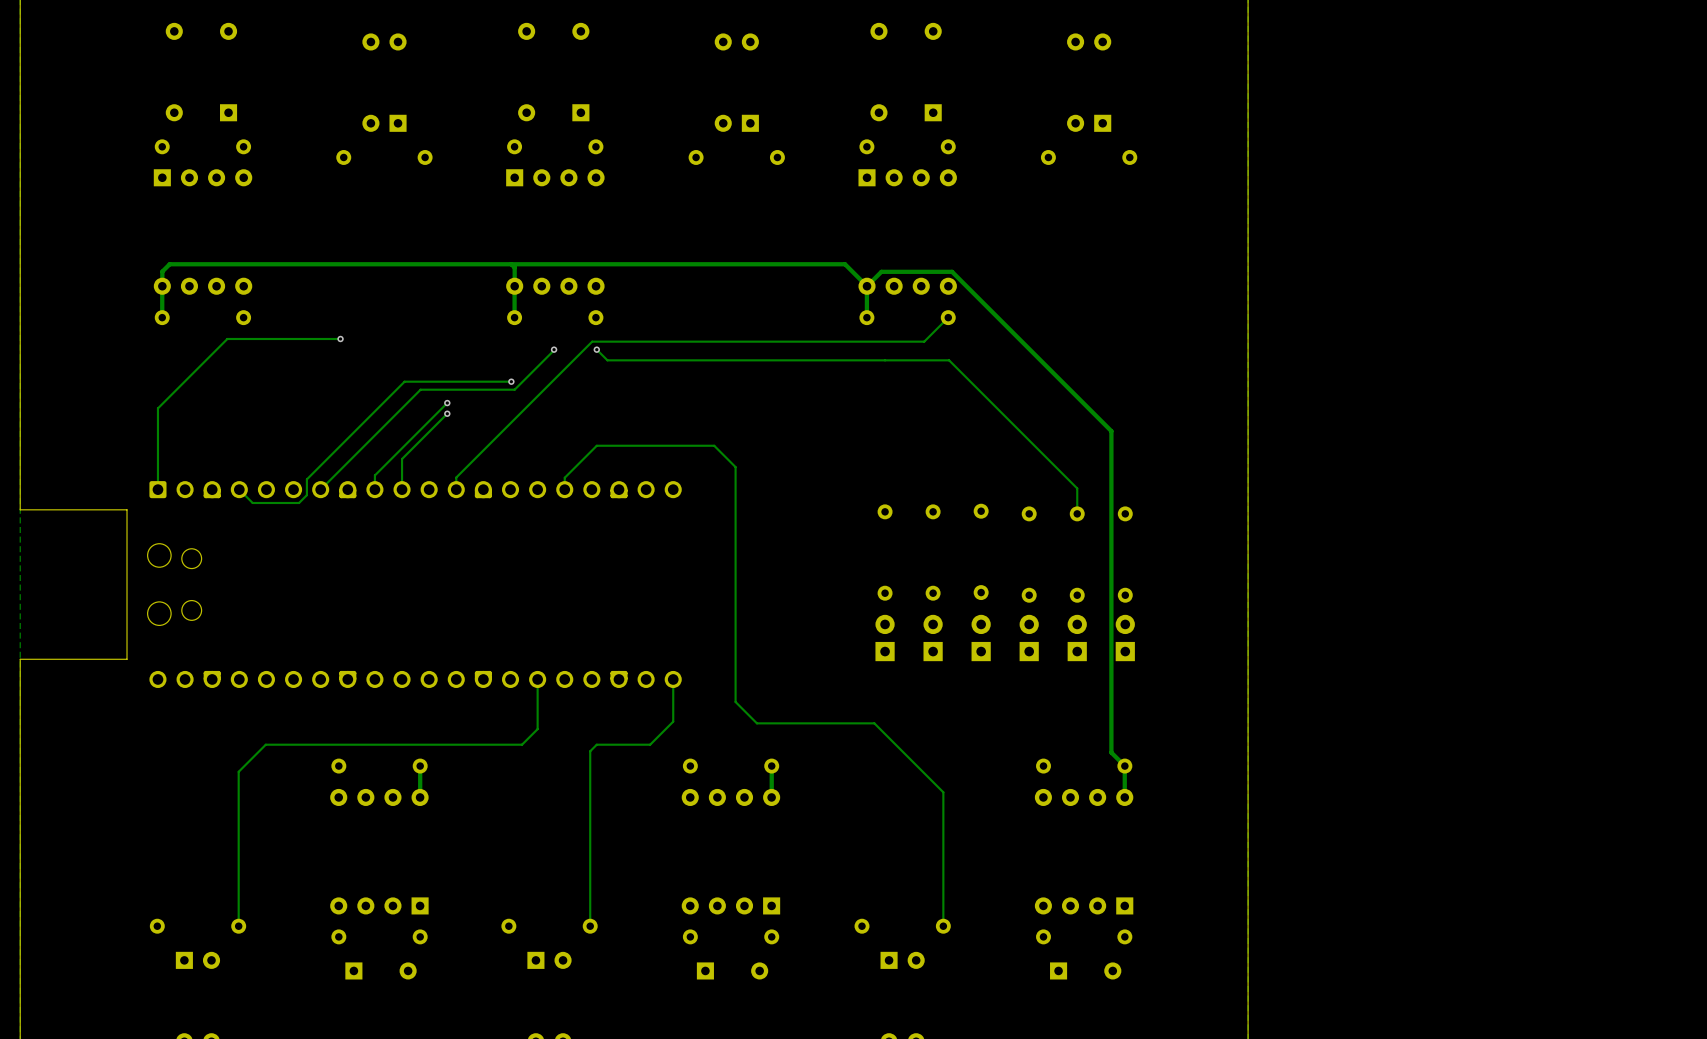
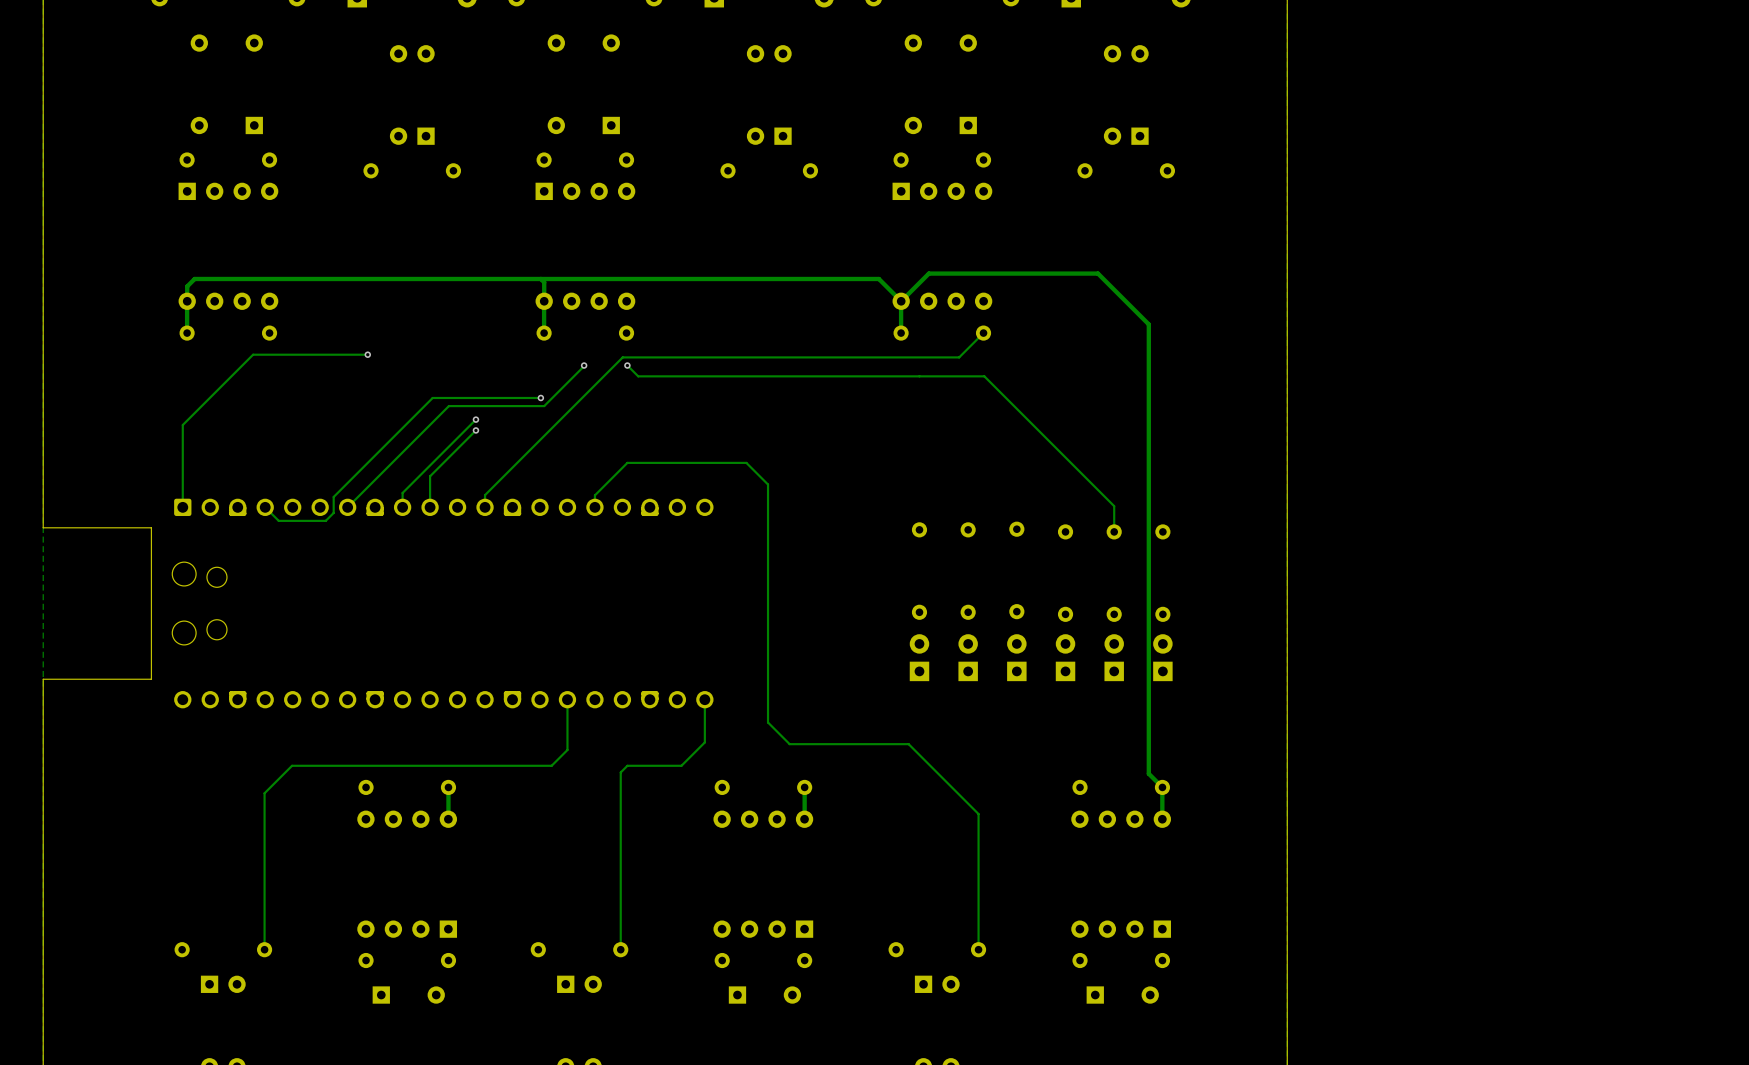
track: (881, 271) (952, 271) (1111, 431) -> (915, 286) (928, 273) (1097, 273) (1148, 324) (1148, 448)

